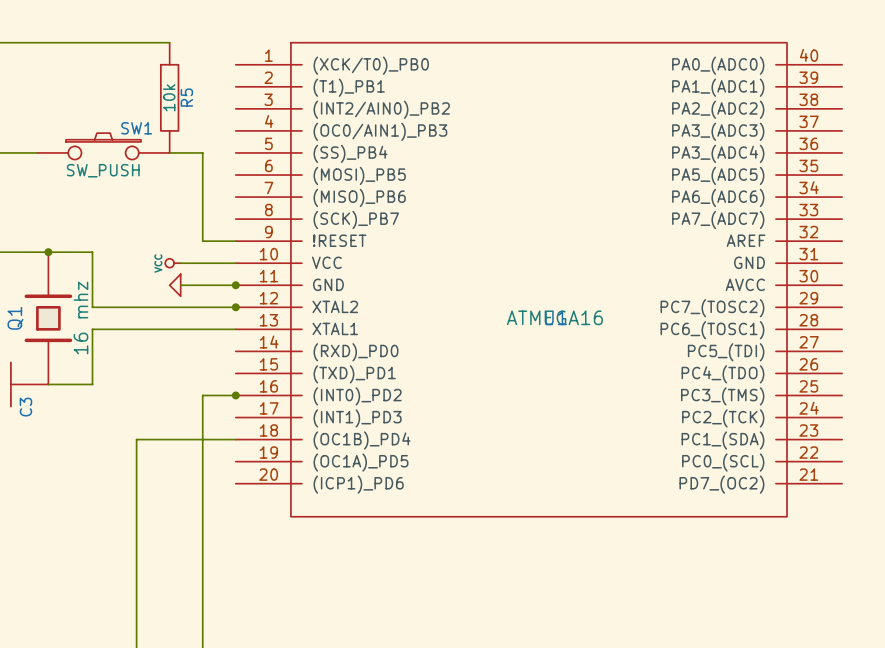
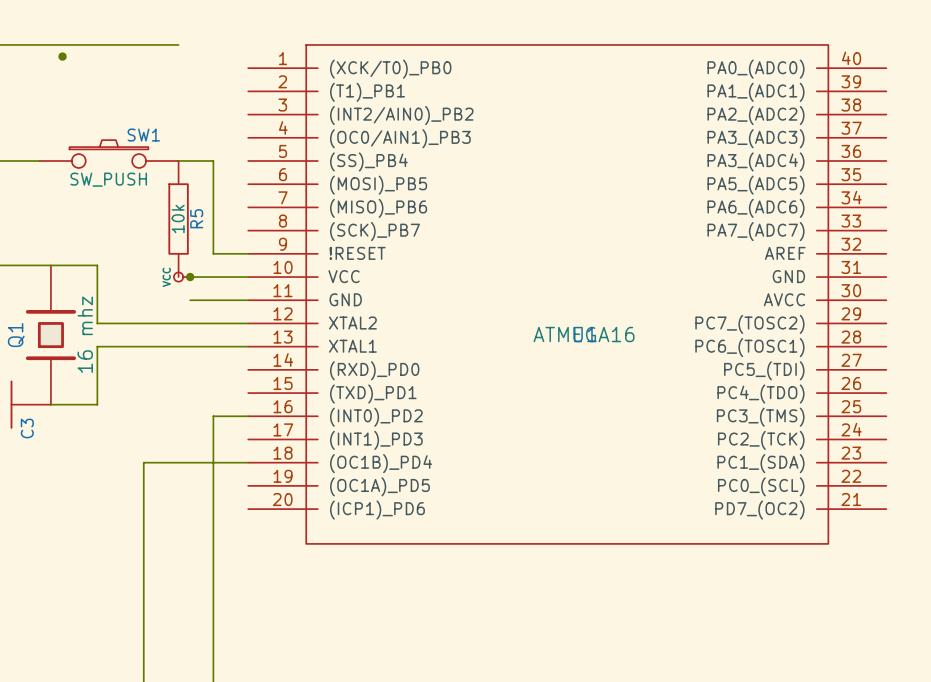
junction: none -> (62, 56)
R5 position: (169, 97) -> (178, 219)
junction: (48, 252) -> none
junction: none -> (190, 277)
power symbol: (175, 285) -> none
junction: (235, 285) -> none
junction: (235, 307) -> none
junction: (235, 395) -> none

